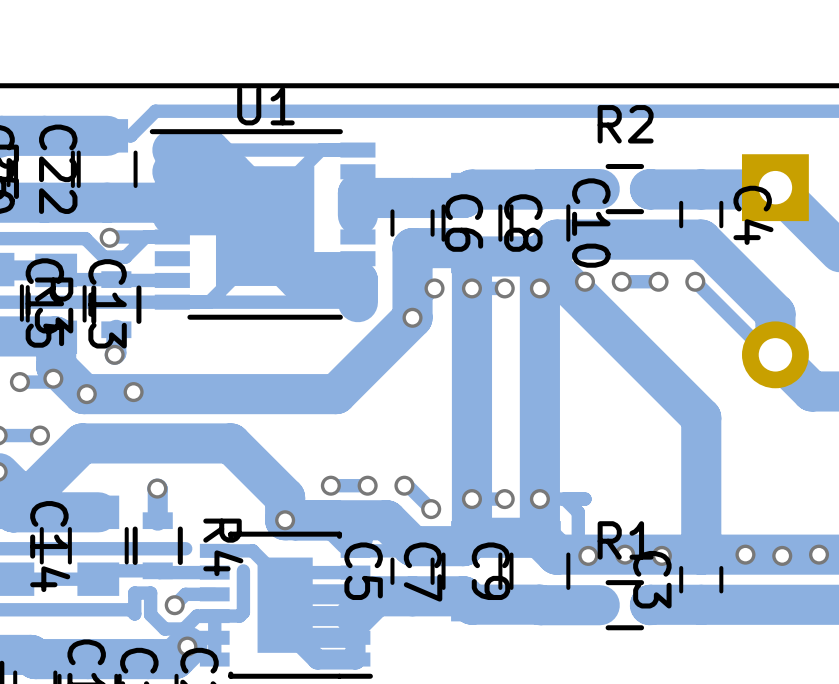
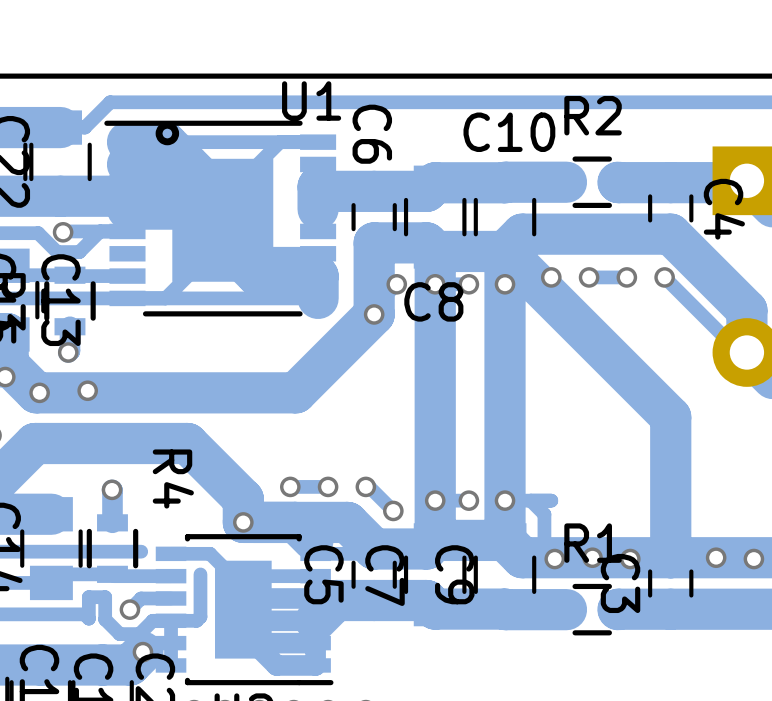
U1 name position: U1 (265, 106) -> U1 (311, 101)
drawing: none -> [155, 121, 180, 146]
C6 name position: C6 (463, 223) -> C6 (372, 134)
C8 name rotation: 0° (523, 223) -> 90° counterclockwise (433, 301)
C8 name position: C8 (523, 223) -> C8 (433, 301)
C10 name rotation: 0° (591, 223) -> 90° counterclockwise (509, 132)
R4 name position: R4 (223, 547) -> R4 (173, 479)

